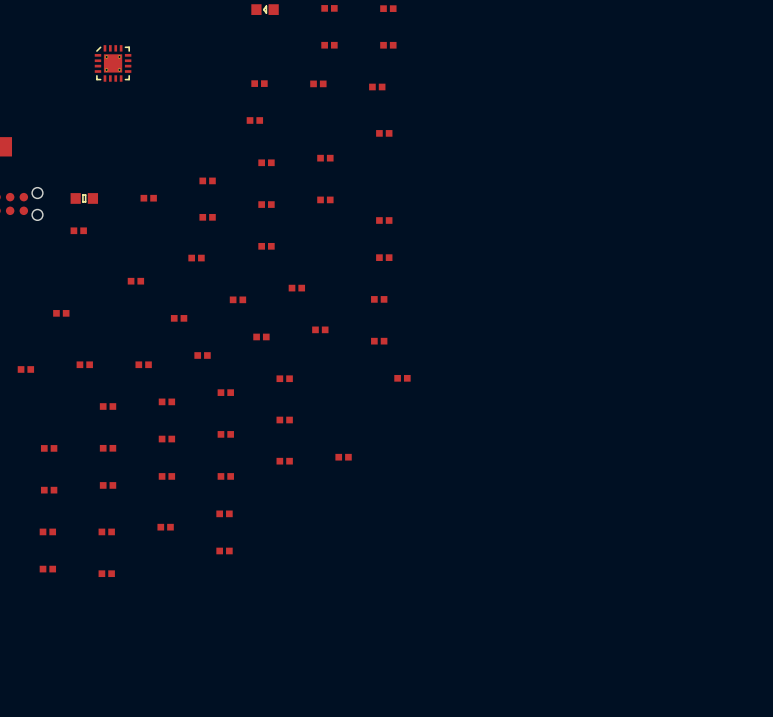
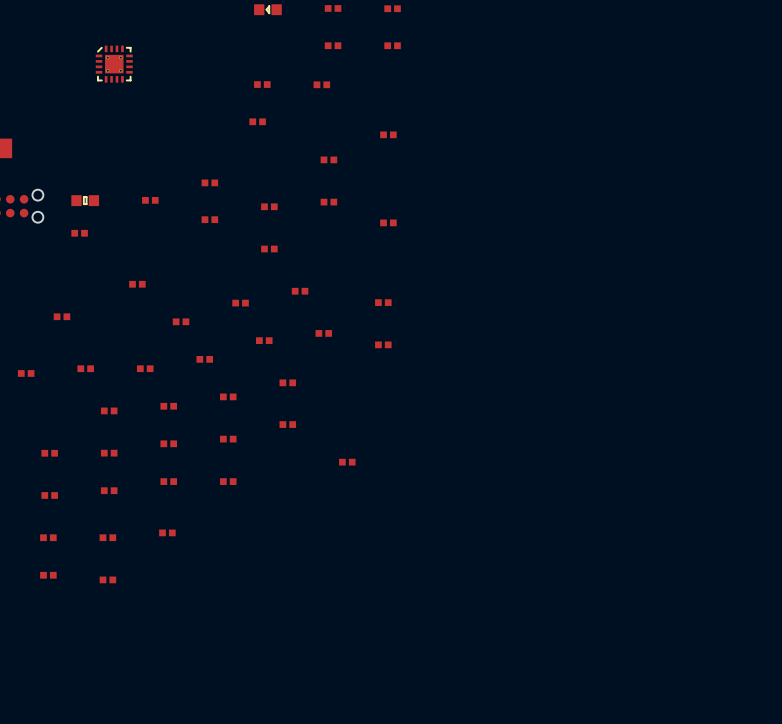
part: (377, 86) -> none
part: (266, 162) -> none
part: (384, 257) -> none
part: (196, 258) -> none
part: (402, 378) -> none
part: (284, 461) -> none
part: (224, 513) -> none
part: (224, 550) -> none

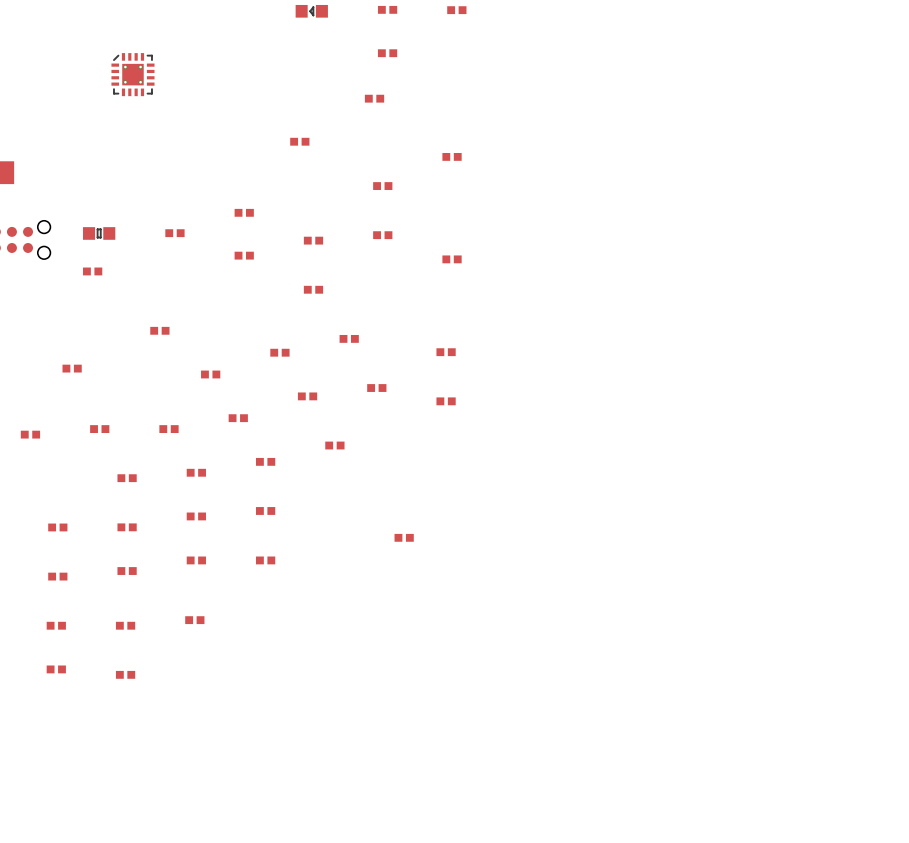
part: (392, 45) -> none
part: (262, 84) -> none
part: (287, 424) -> none

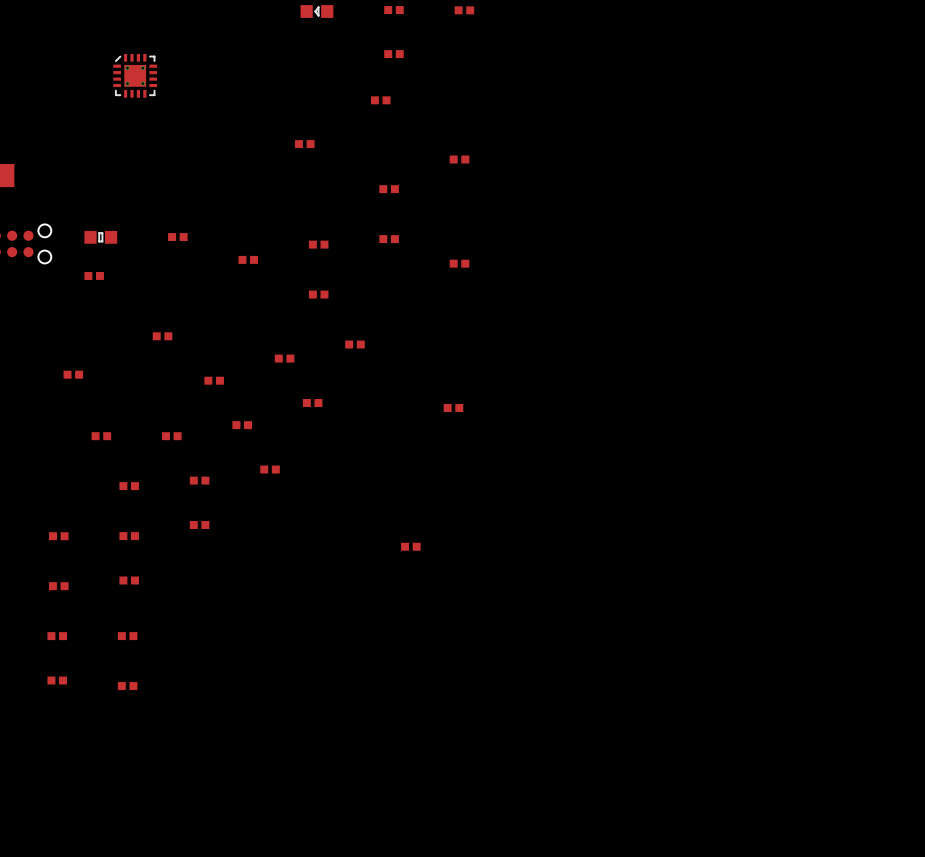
part: (244, 212) -> none
part: (446, 352) -> none
part: (376, 388) -> none
part: (30, 434) -> none
part: (334, 445) -> none
part: (265, 510) -> none
part: (196, 560) -> none
part: (265, 560) -> none
part: (194, 620) -> none

